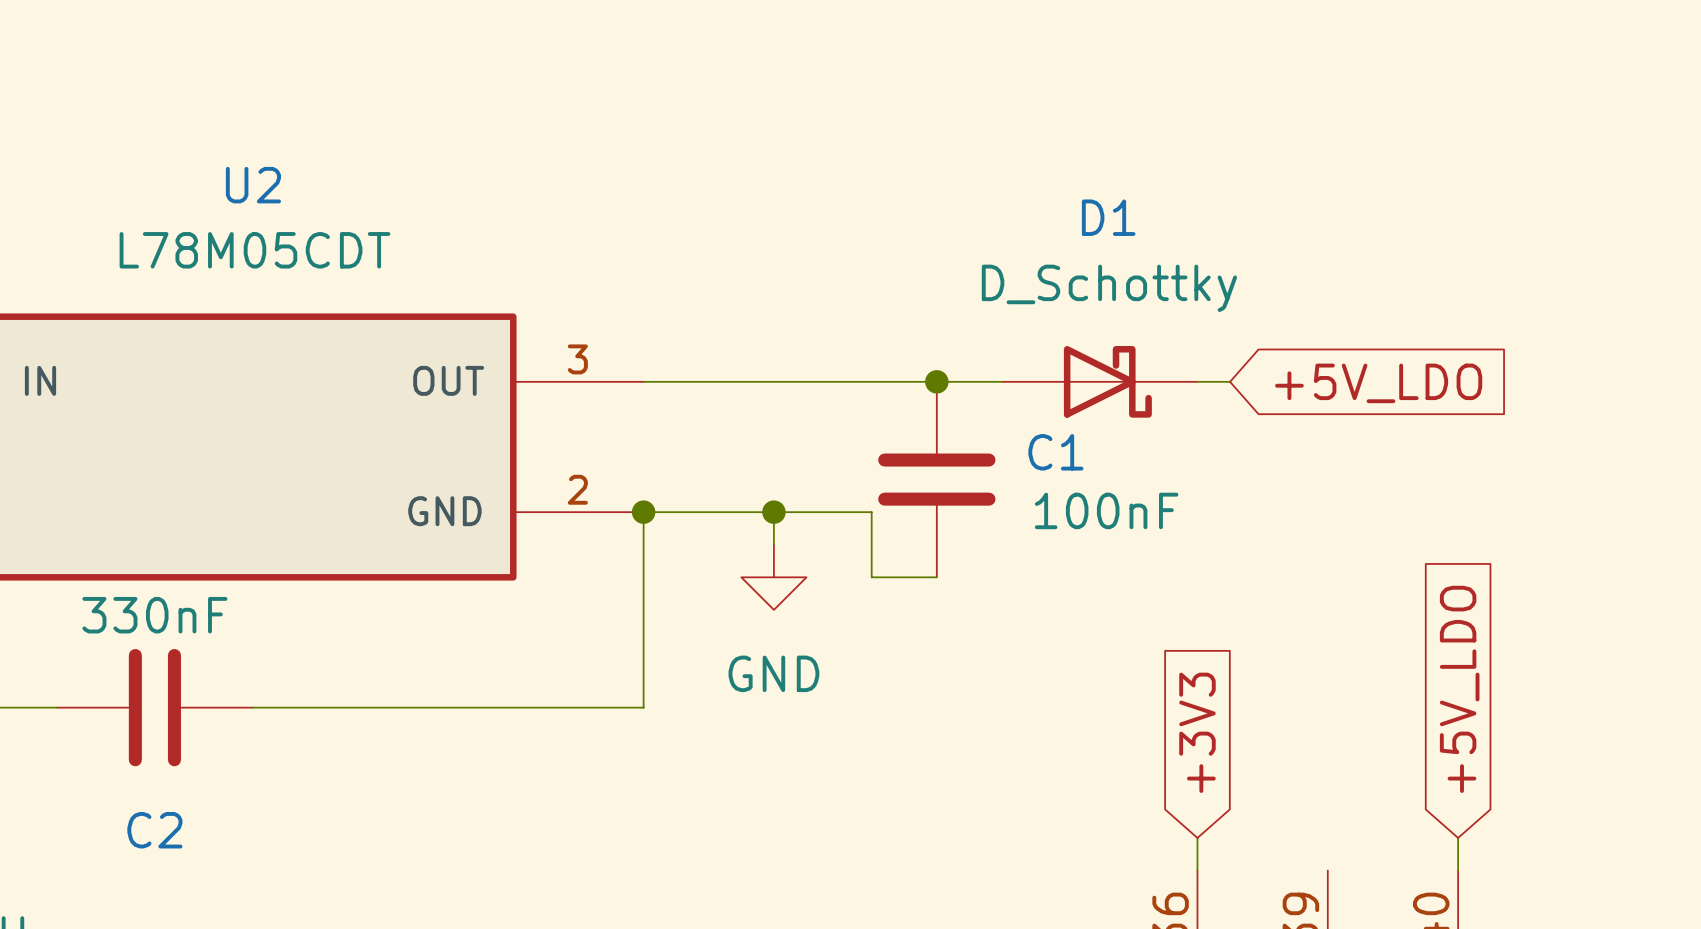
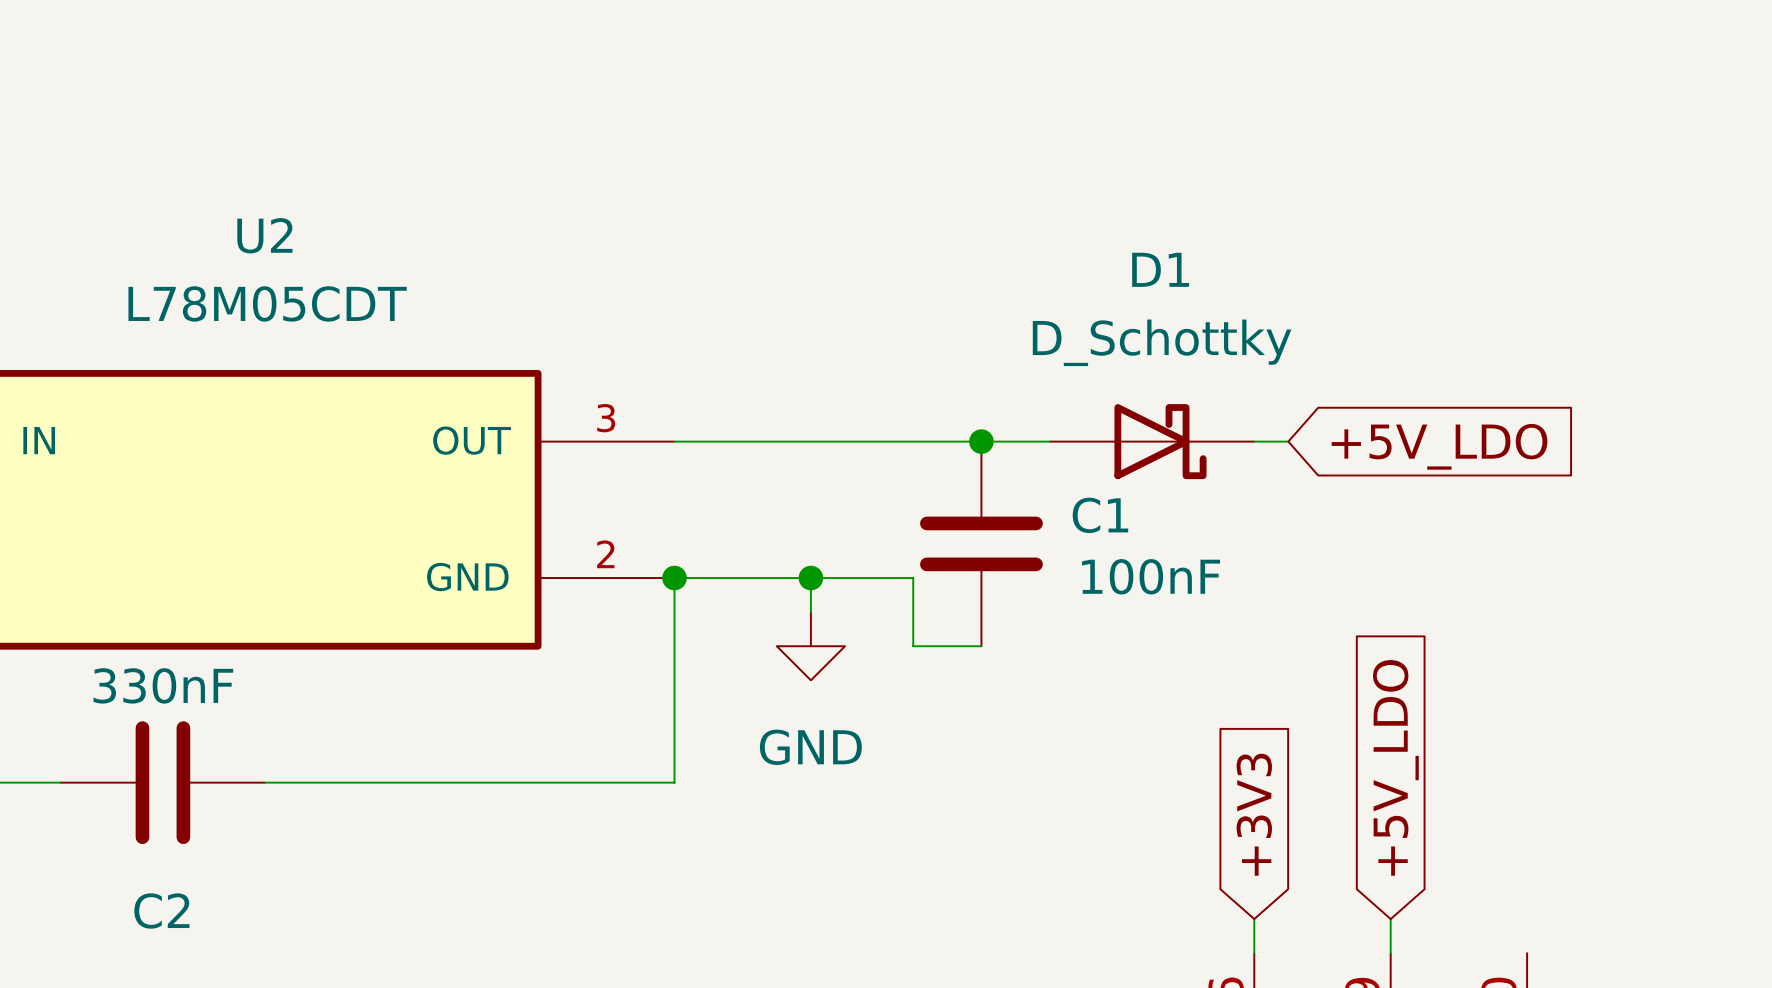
global label position: +5V_LDO (1459, 689) -> +5V_LDO (1395, 767)
wire: (1458, 837) (1458, 870) -> (1390, 919) (1390, 953)

